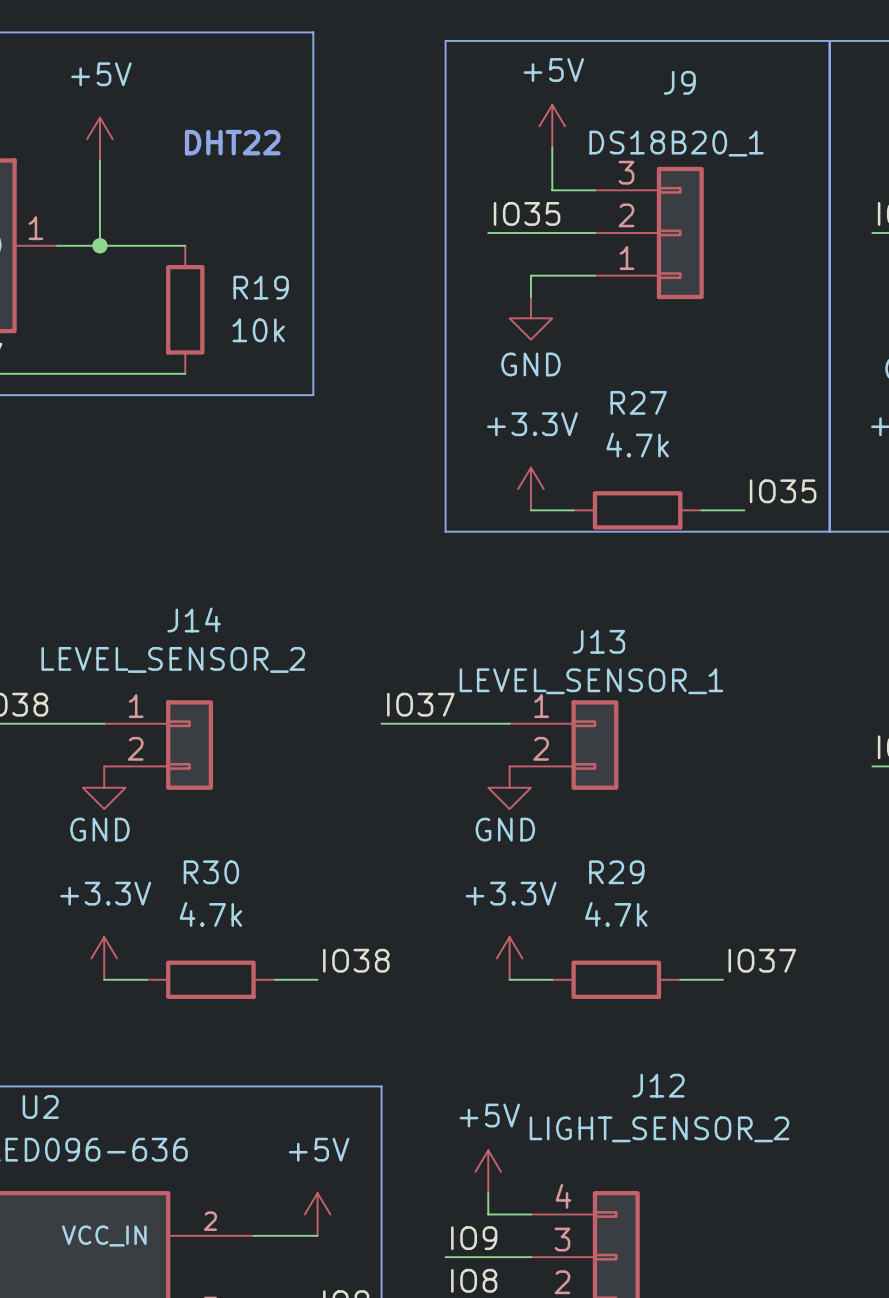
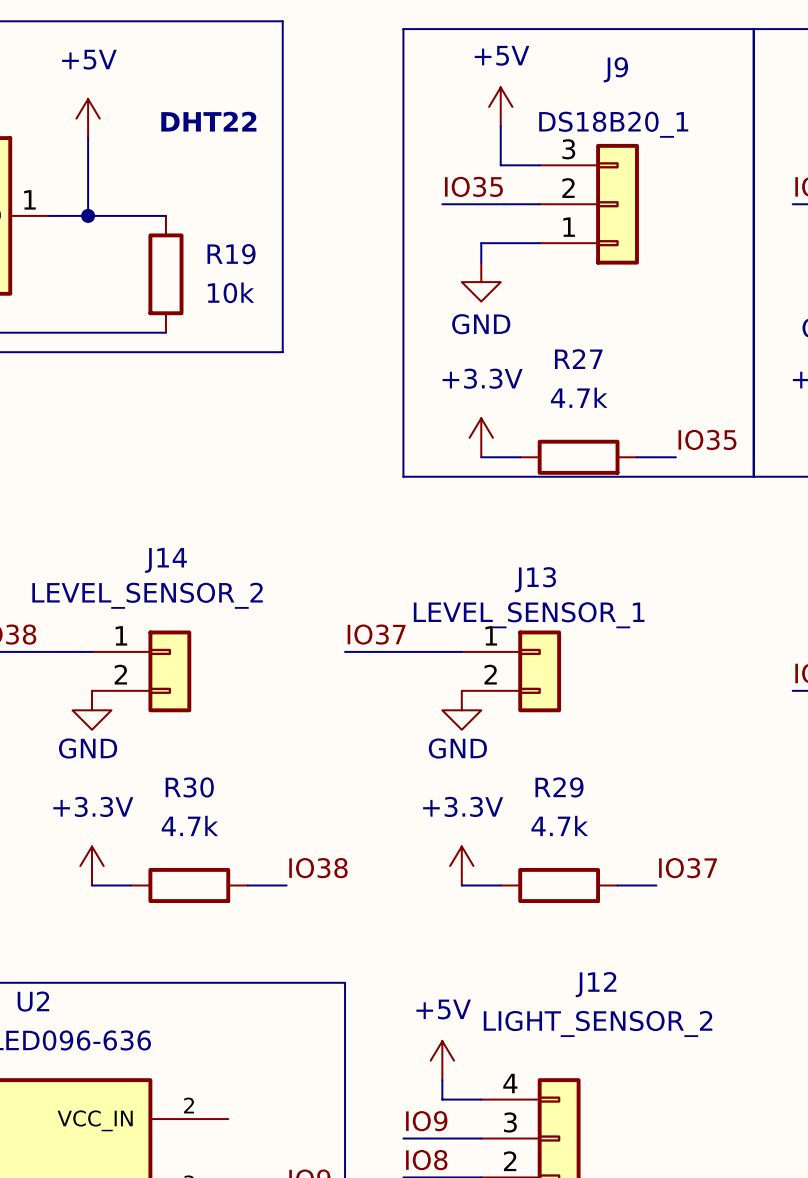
power symbol: +5V (317, 1214) -> none
wire: (253, 1235) (317, 1235) -> none

